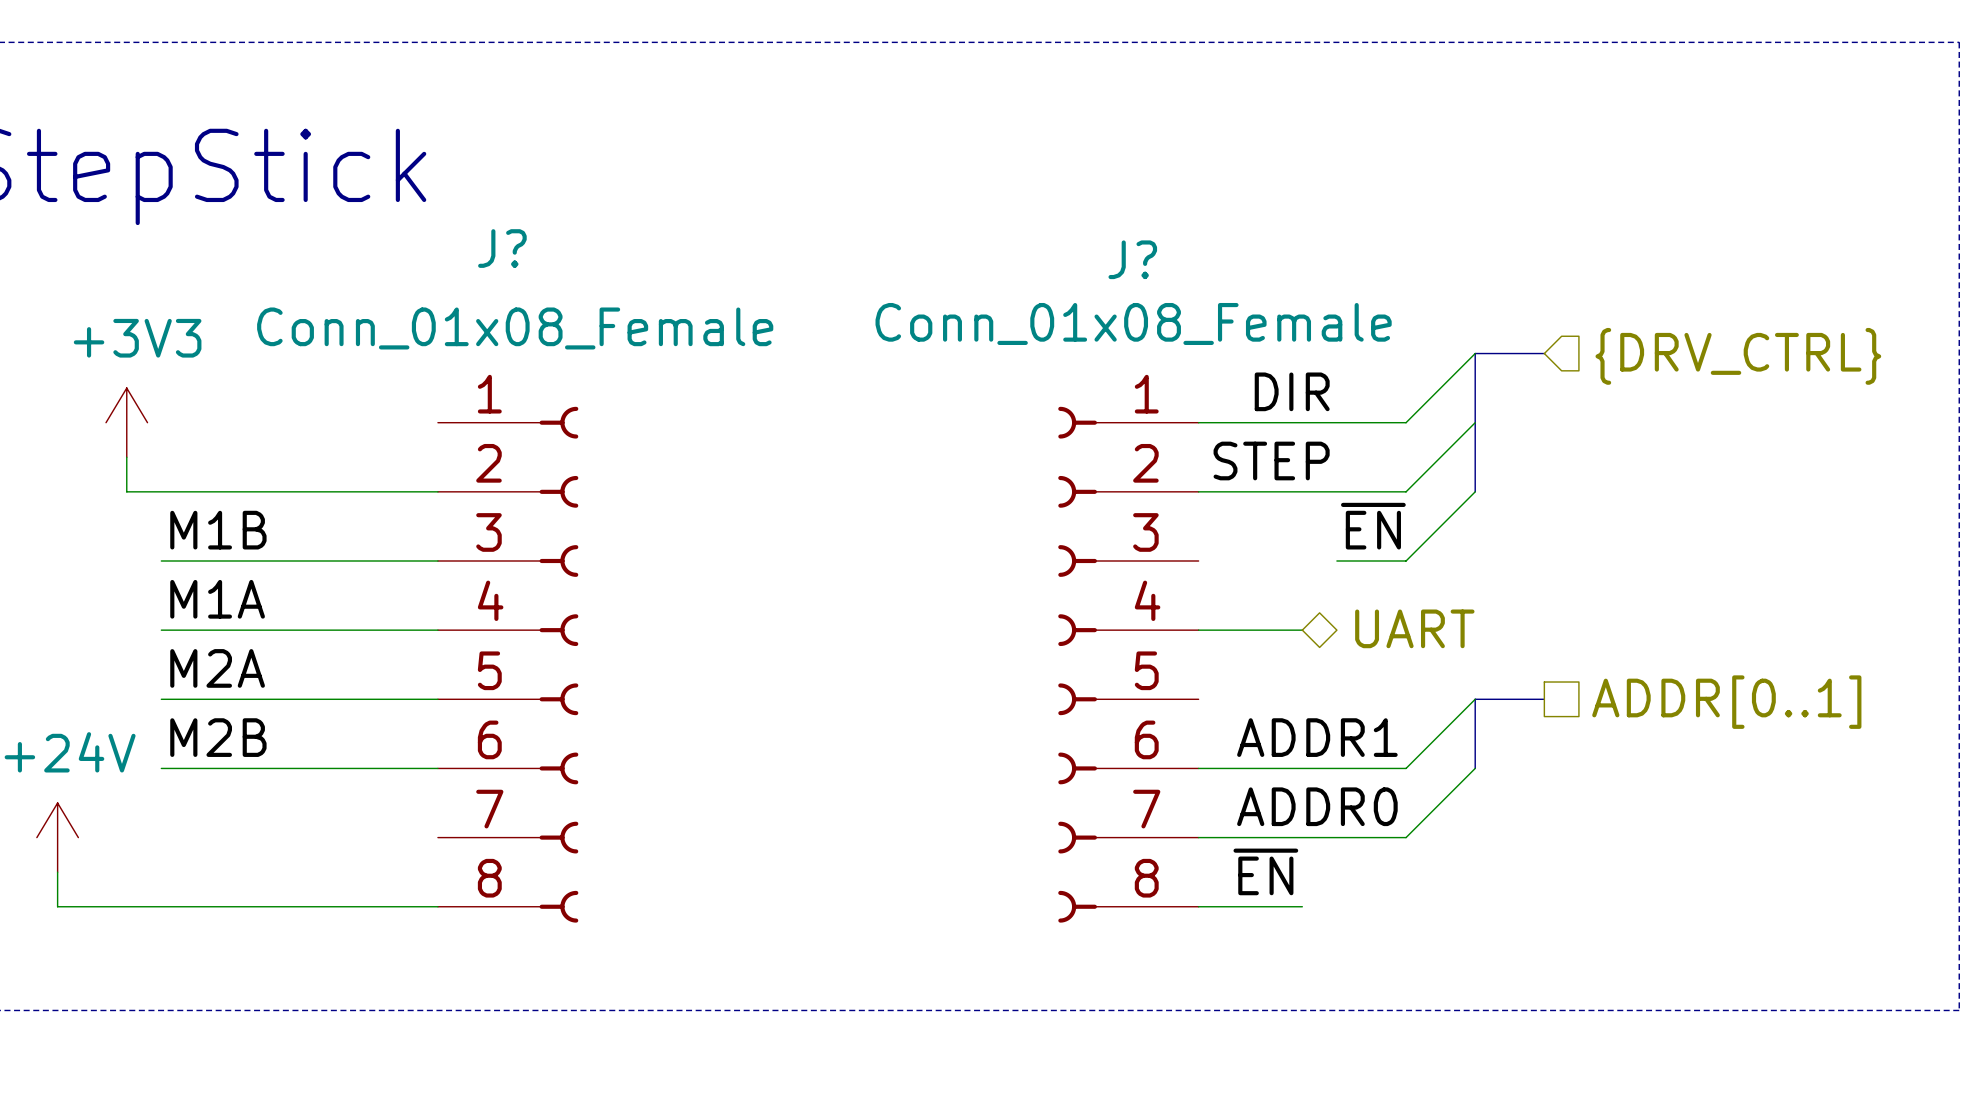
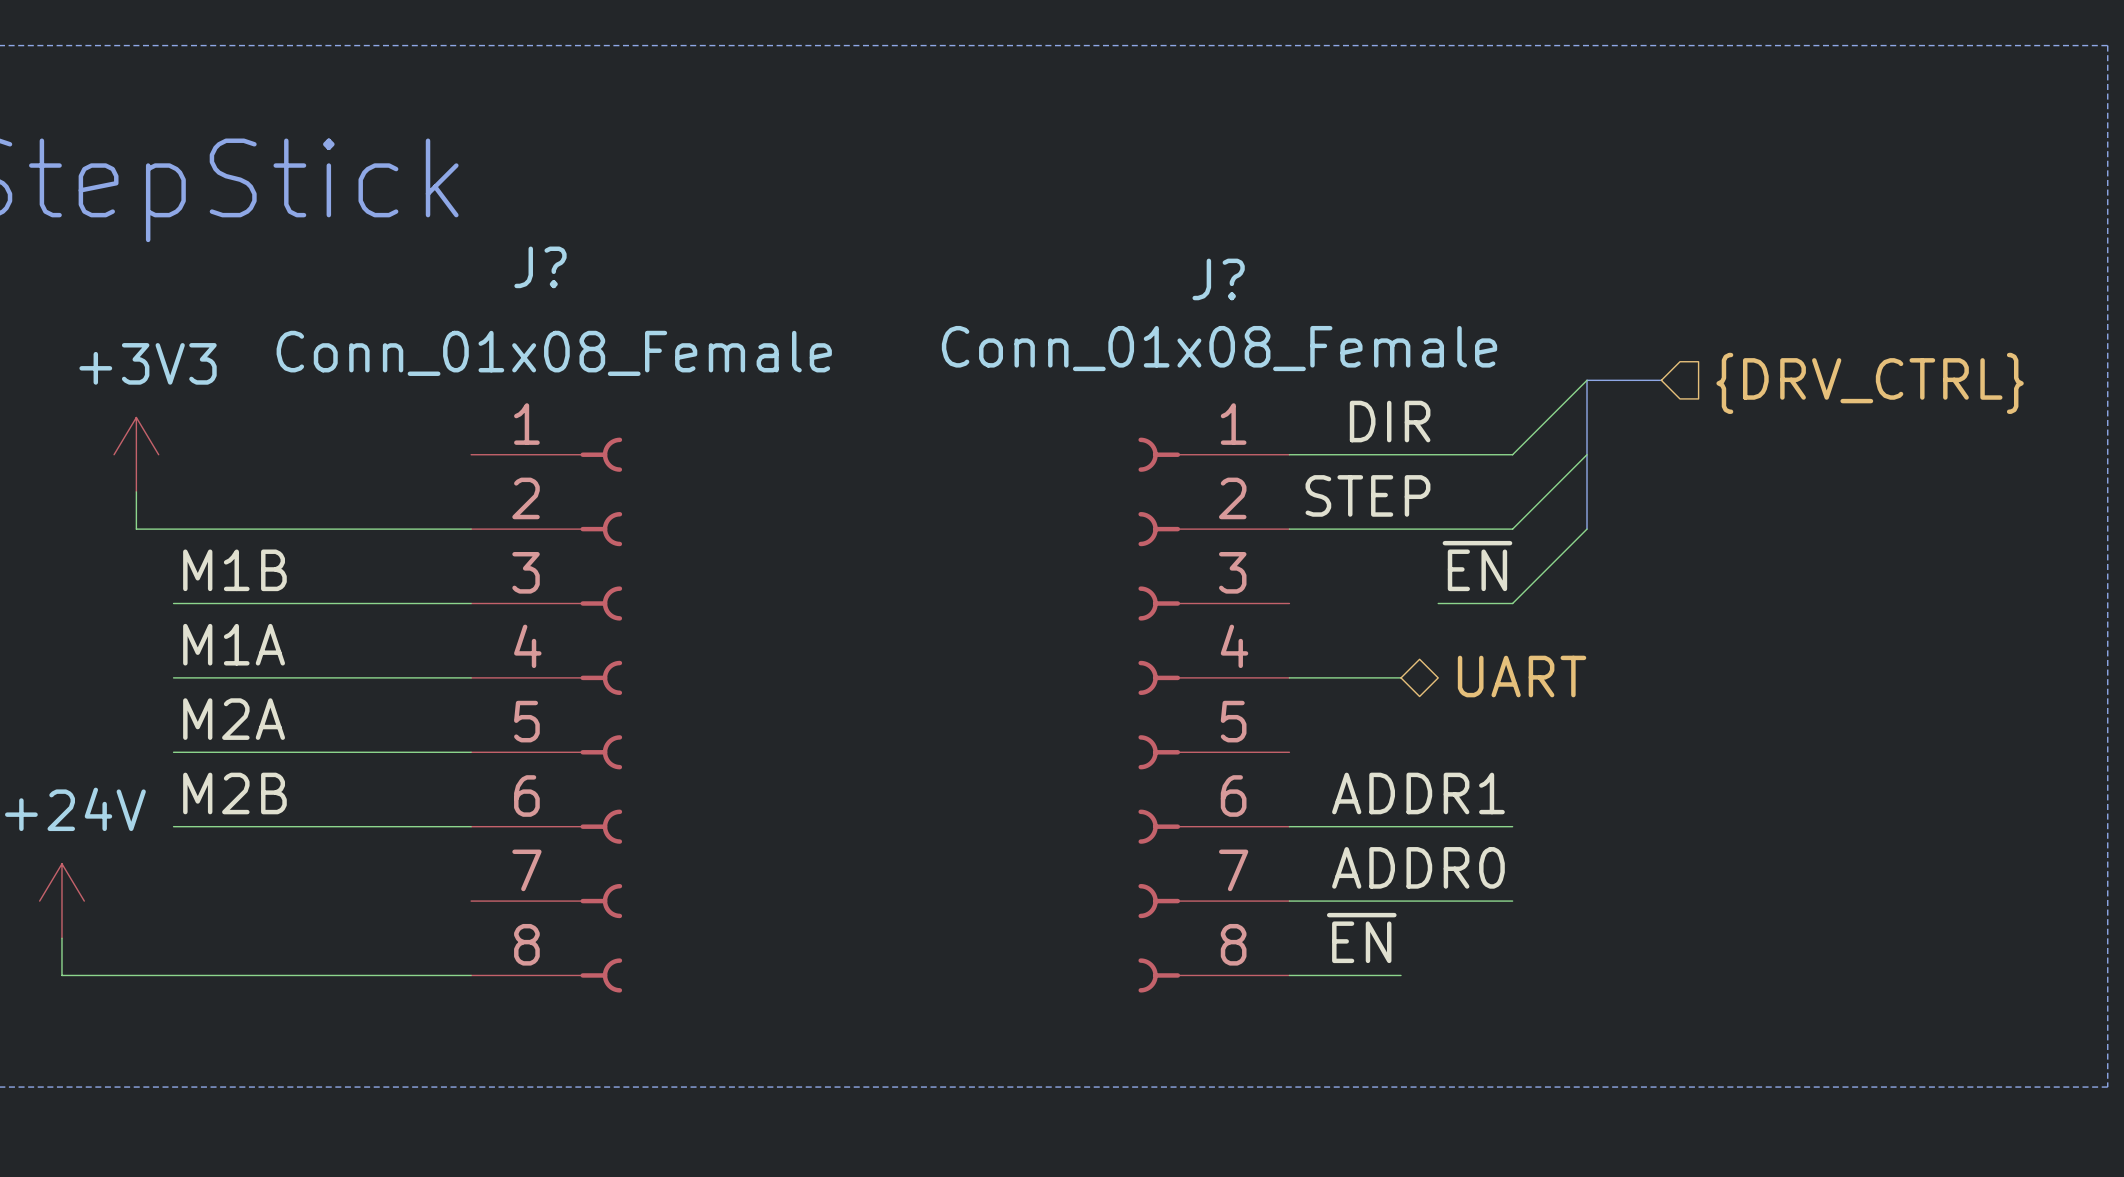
wire: (1475, 699) (1406, 768) -> none
bus: (1544, 699) (1475, 699) (1475, 768) -> none
hierarchical label: ADDR[0..1] (1726, 702) -> none
label position: ADDR1 (1317, 737) -> ADDR1 (1418, 793)
wire: (1475, 768) (1406, 837) -> none
label position: ADDR0 (1317, 806) -> ADDR0 (1418, 867)

